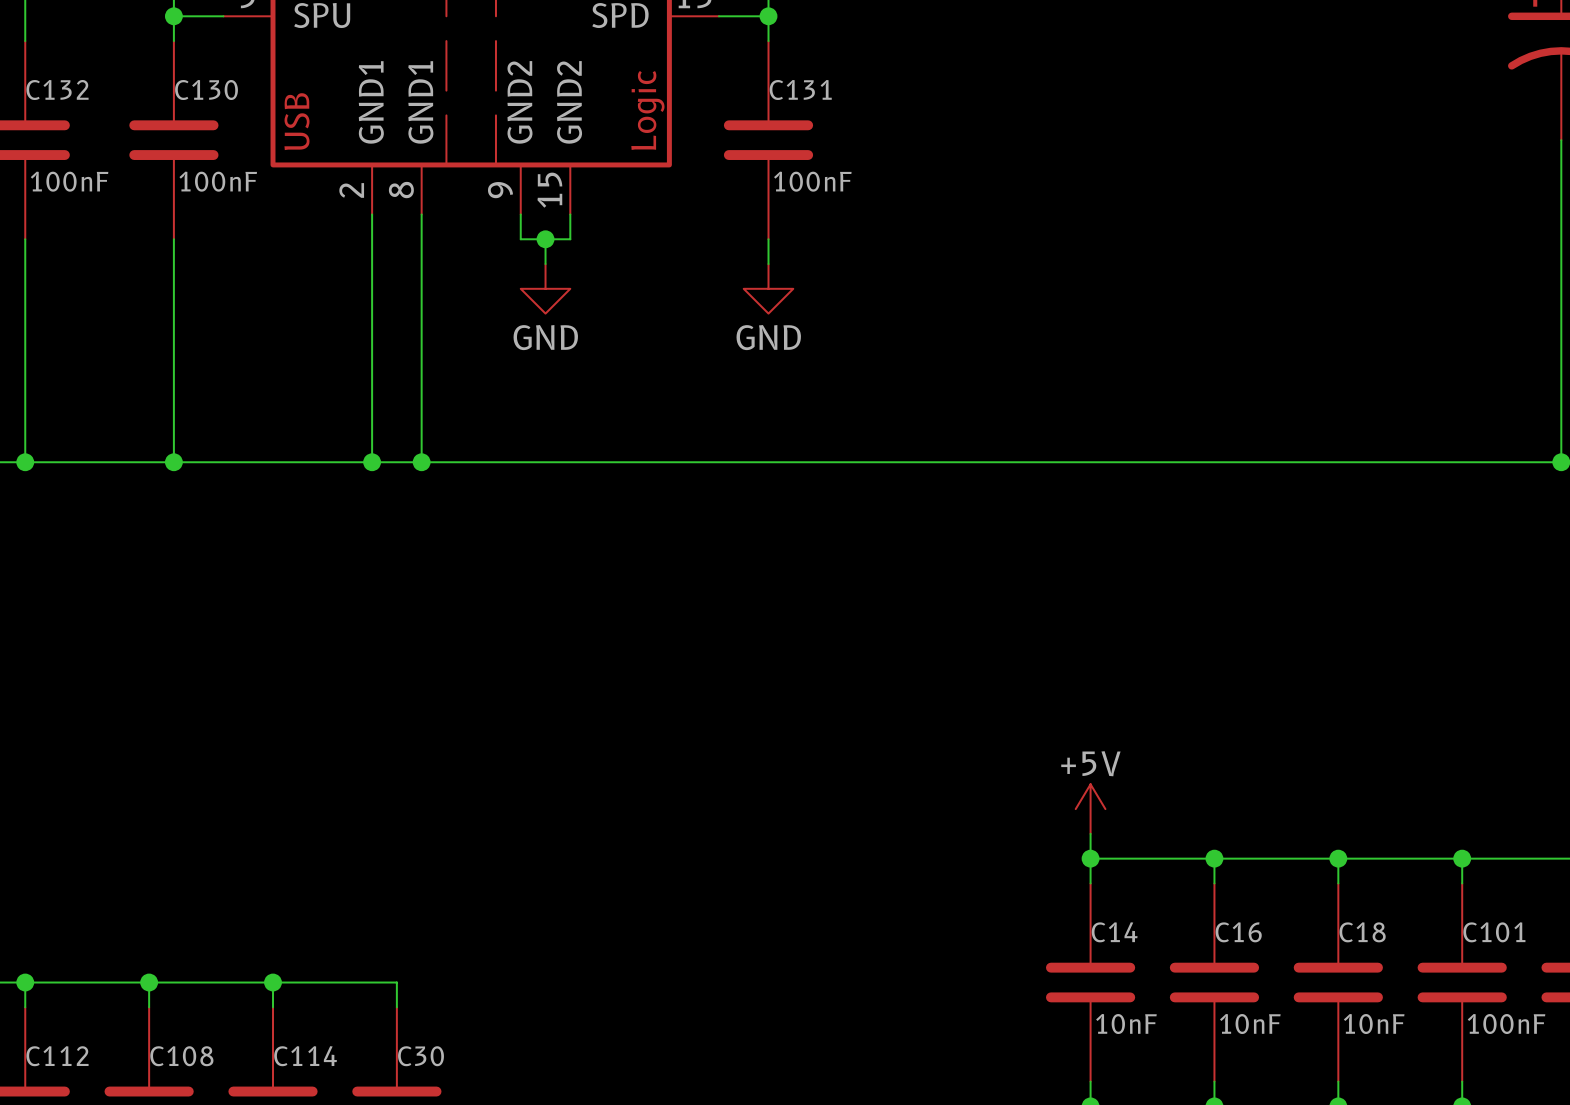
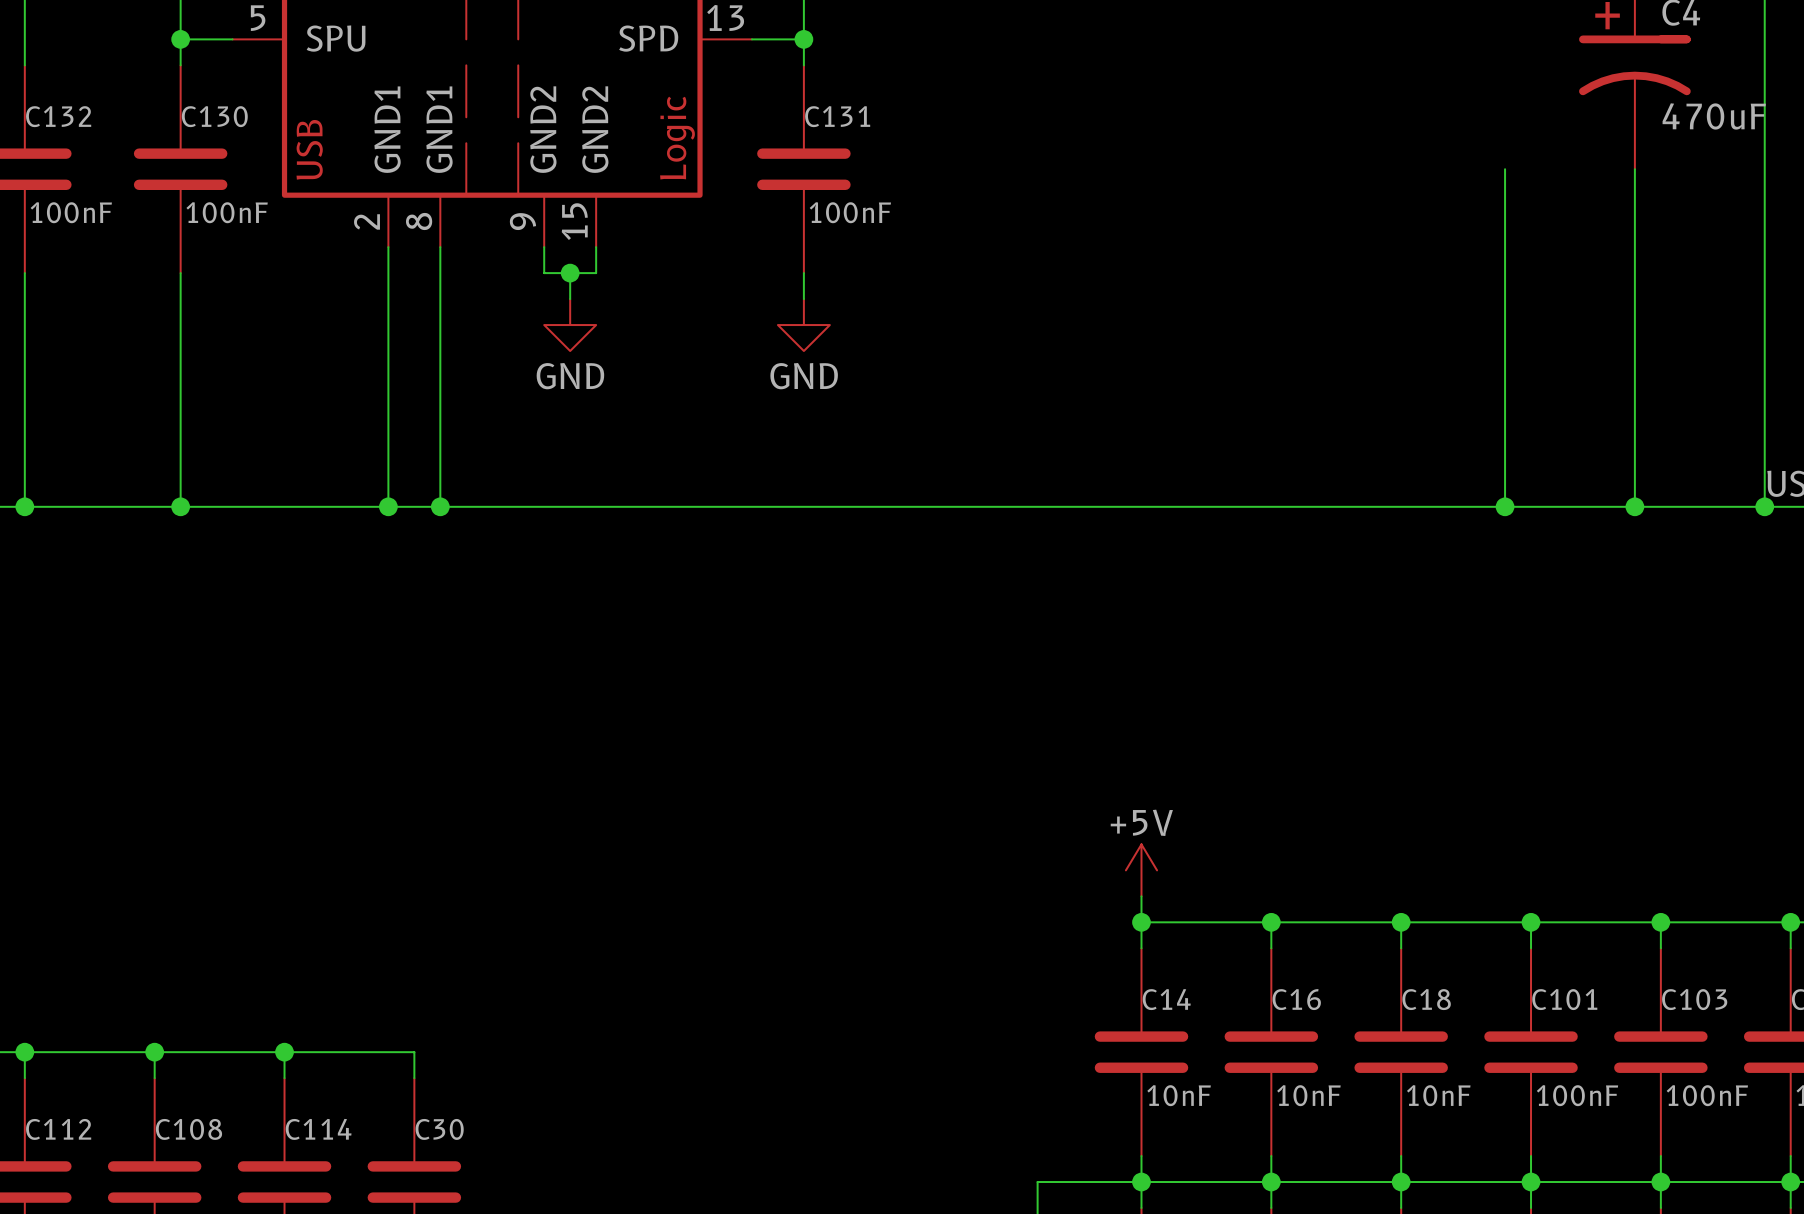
wire: none -> (1505, 169) (1505, 506)
junction: none -> (1505, 506)

